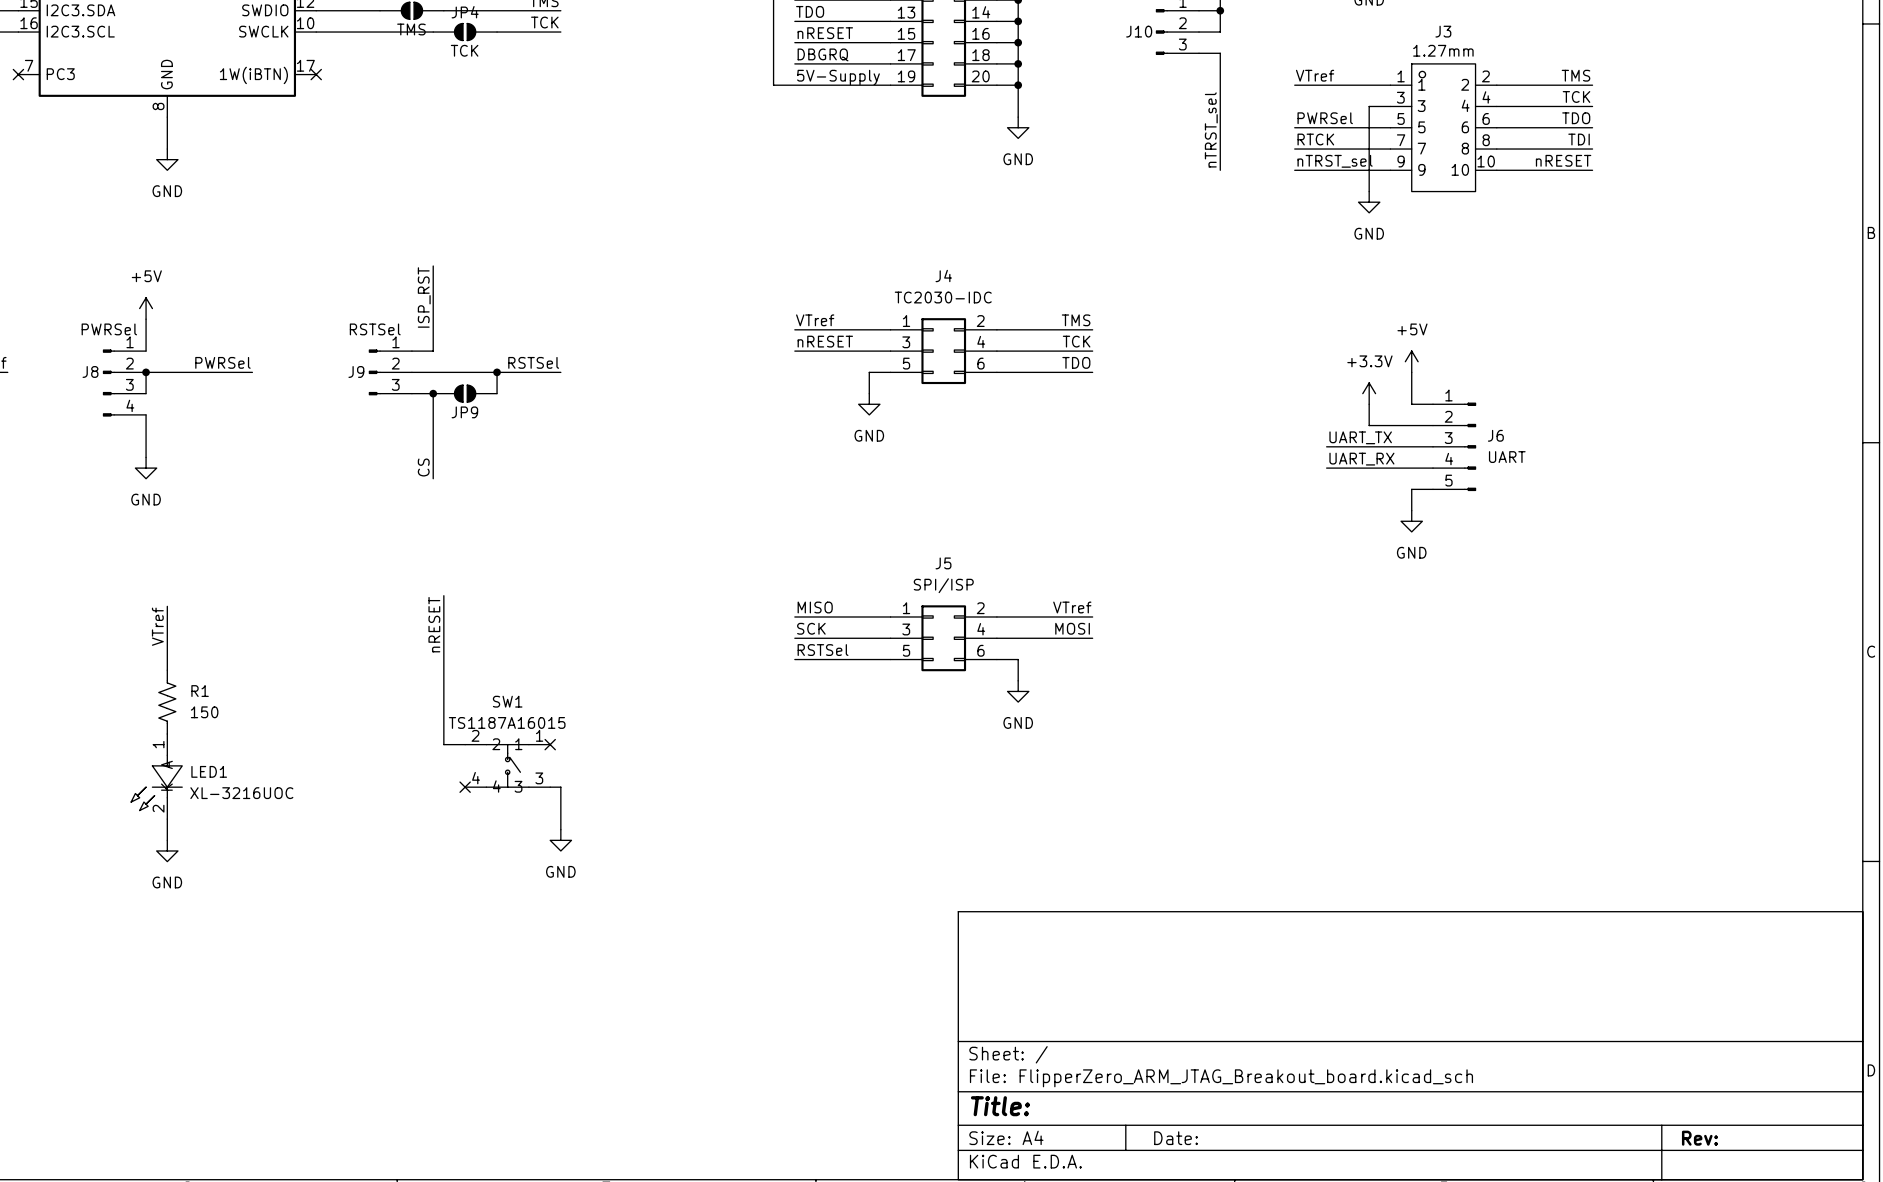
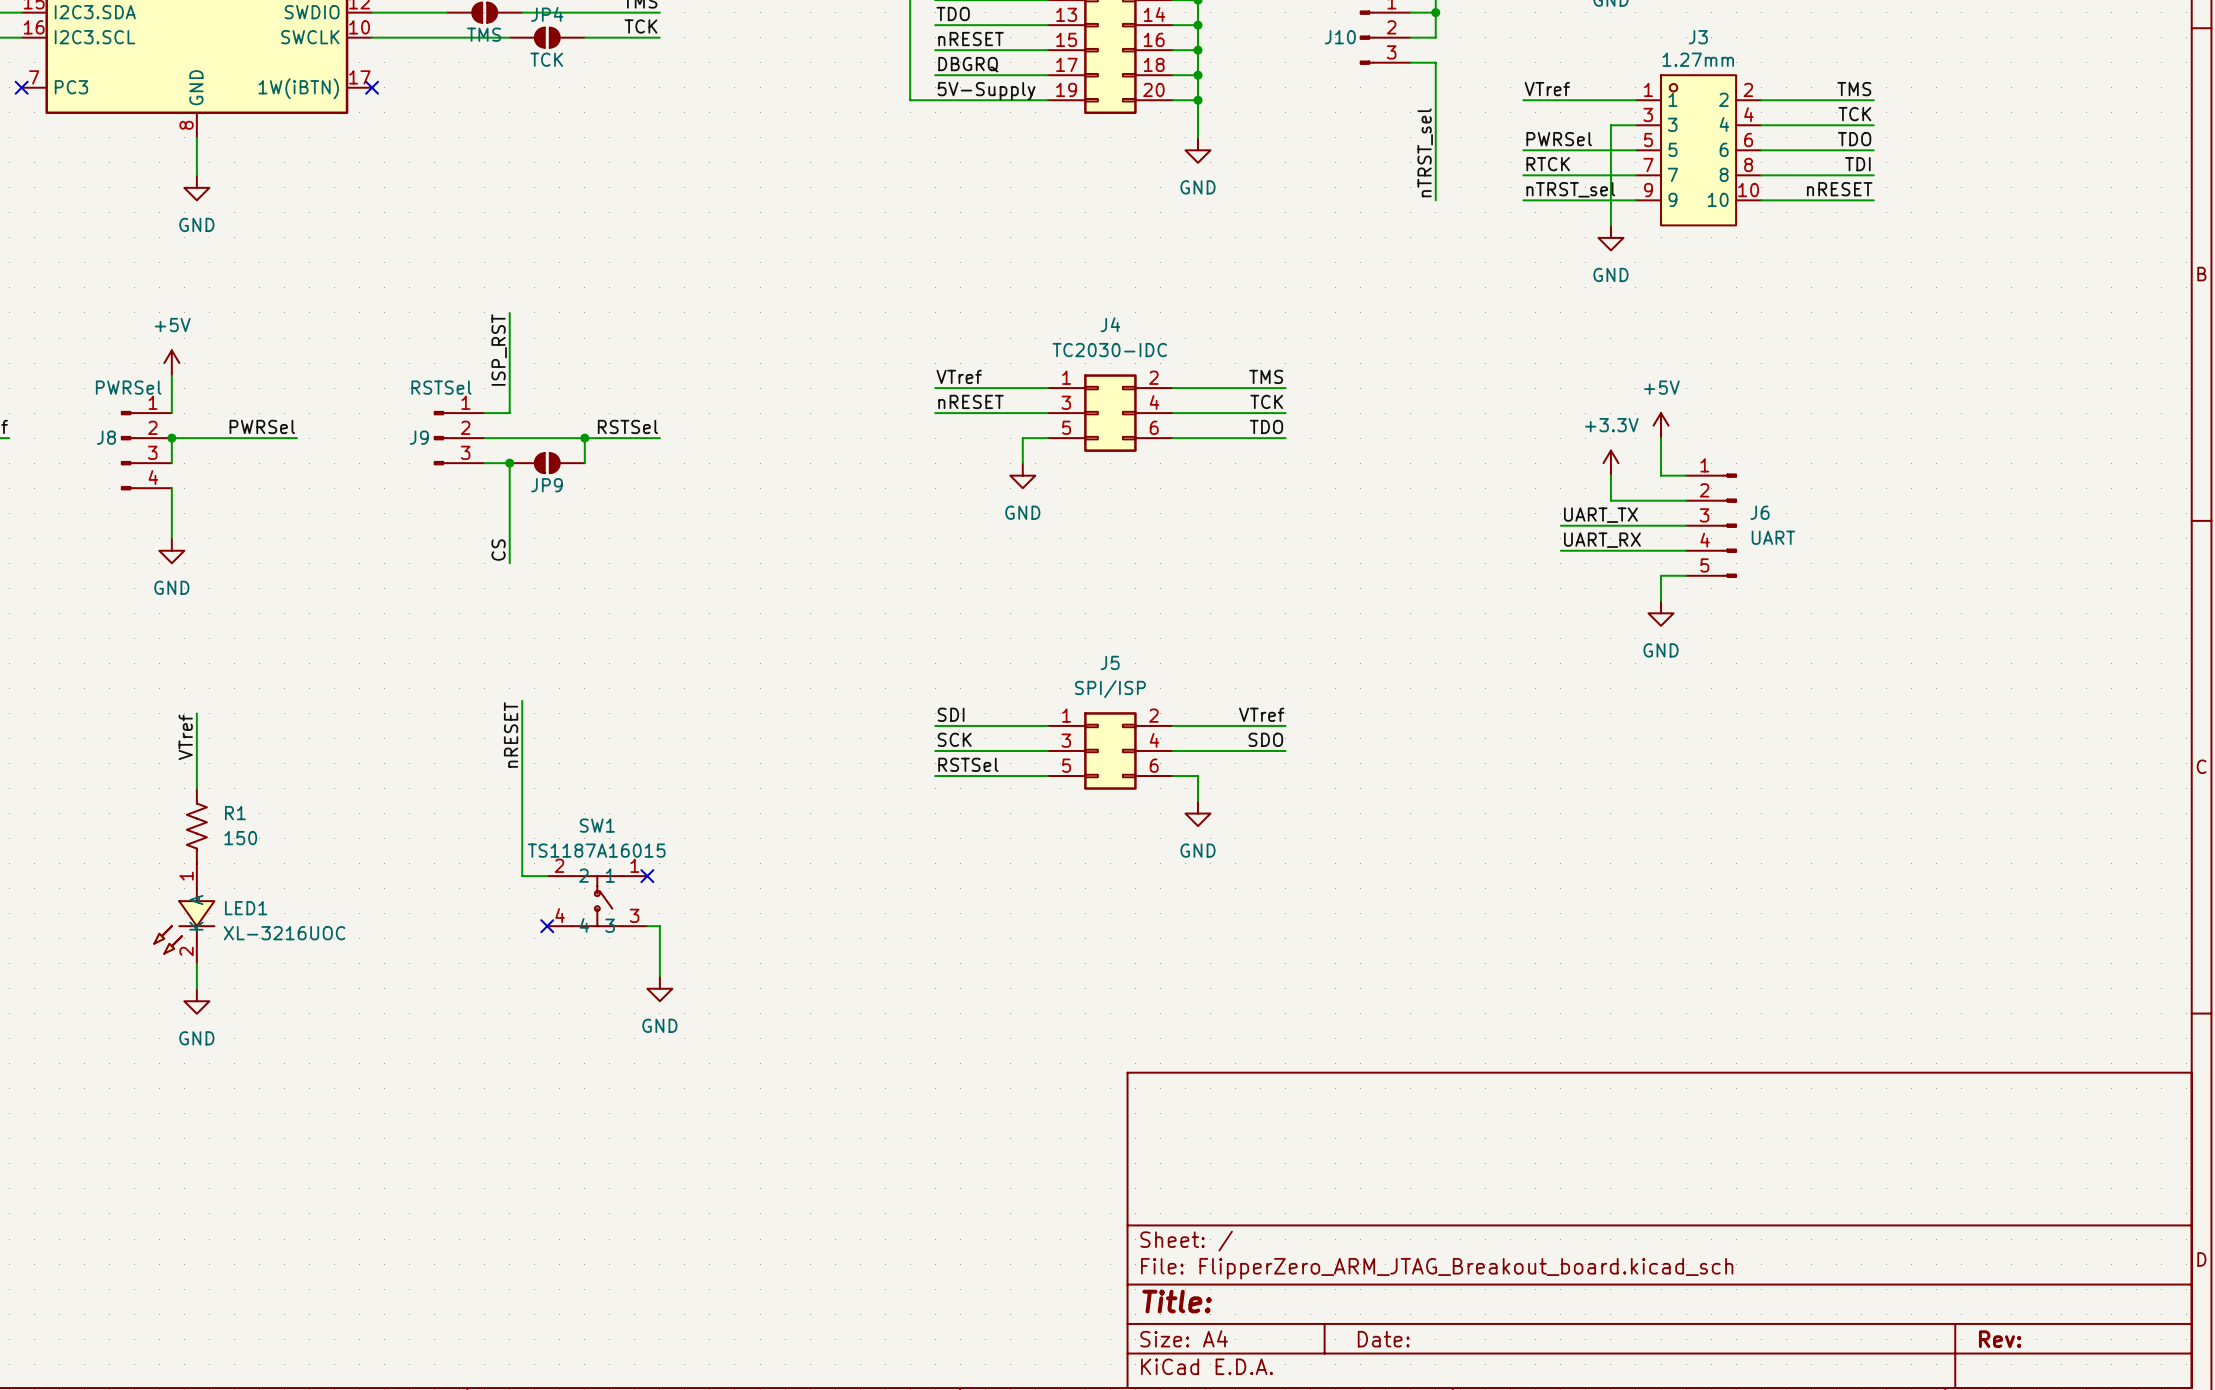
label: MISO (815, 607) -> SDI (951, 714)
label: MOSI (1072, 628) -> SDO (1265, 739)

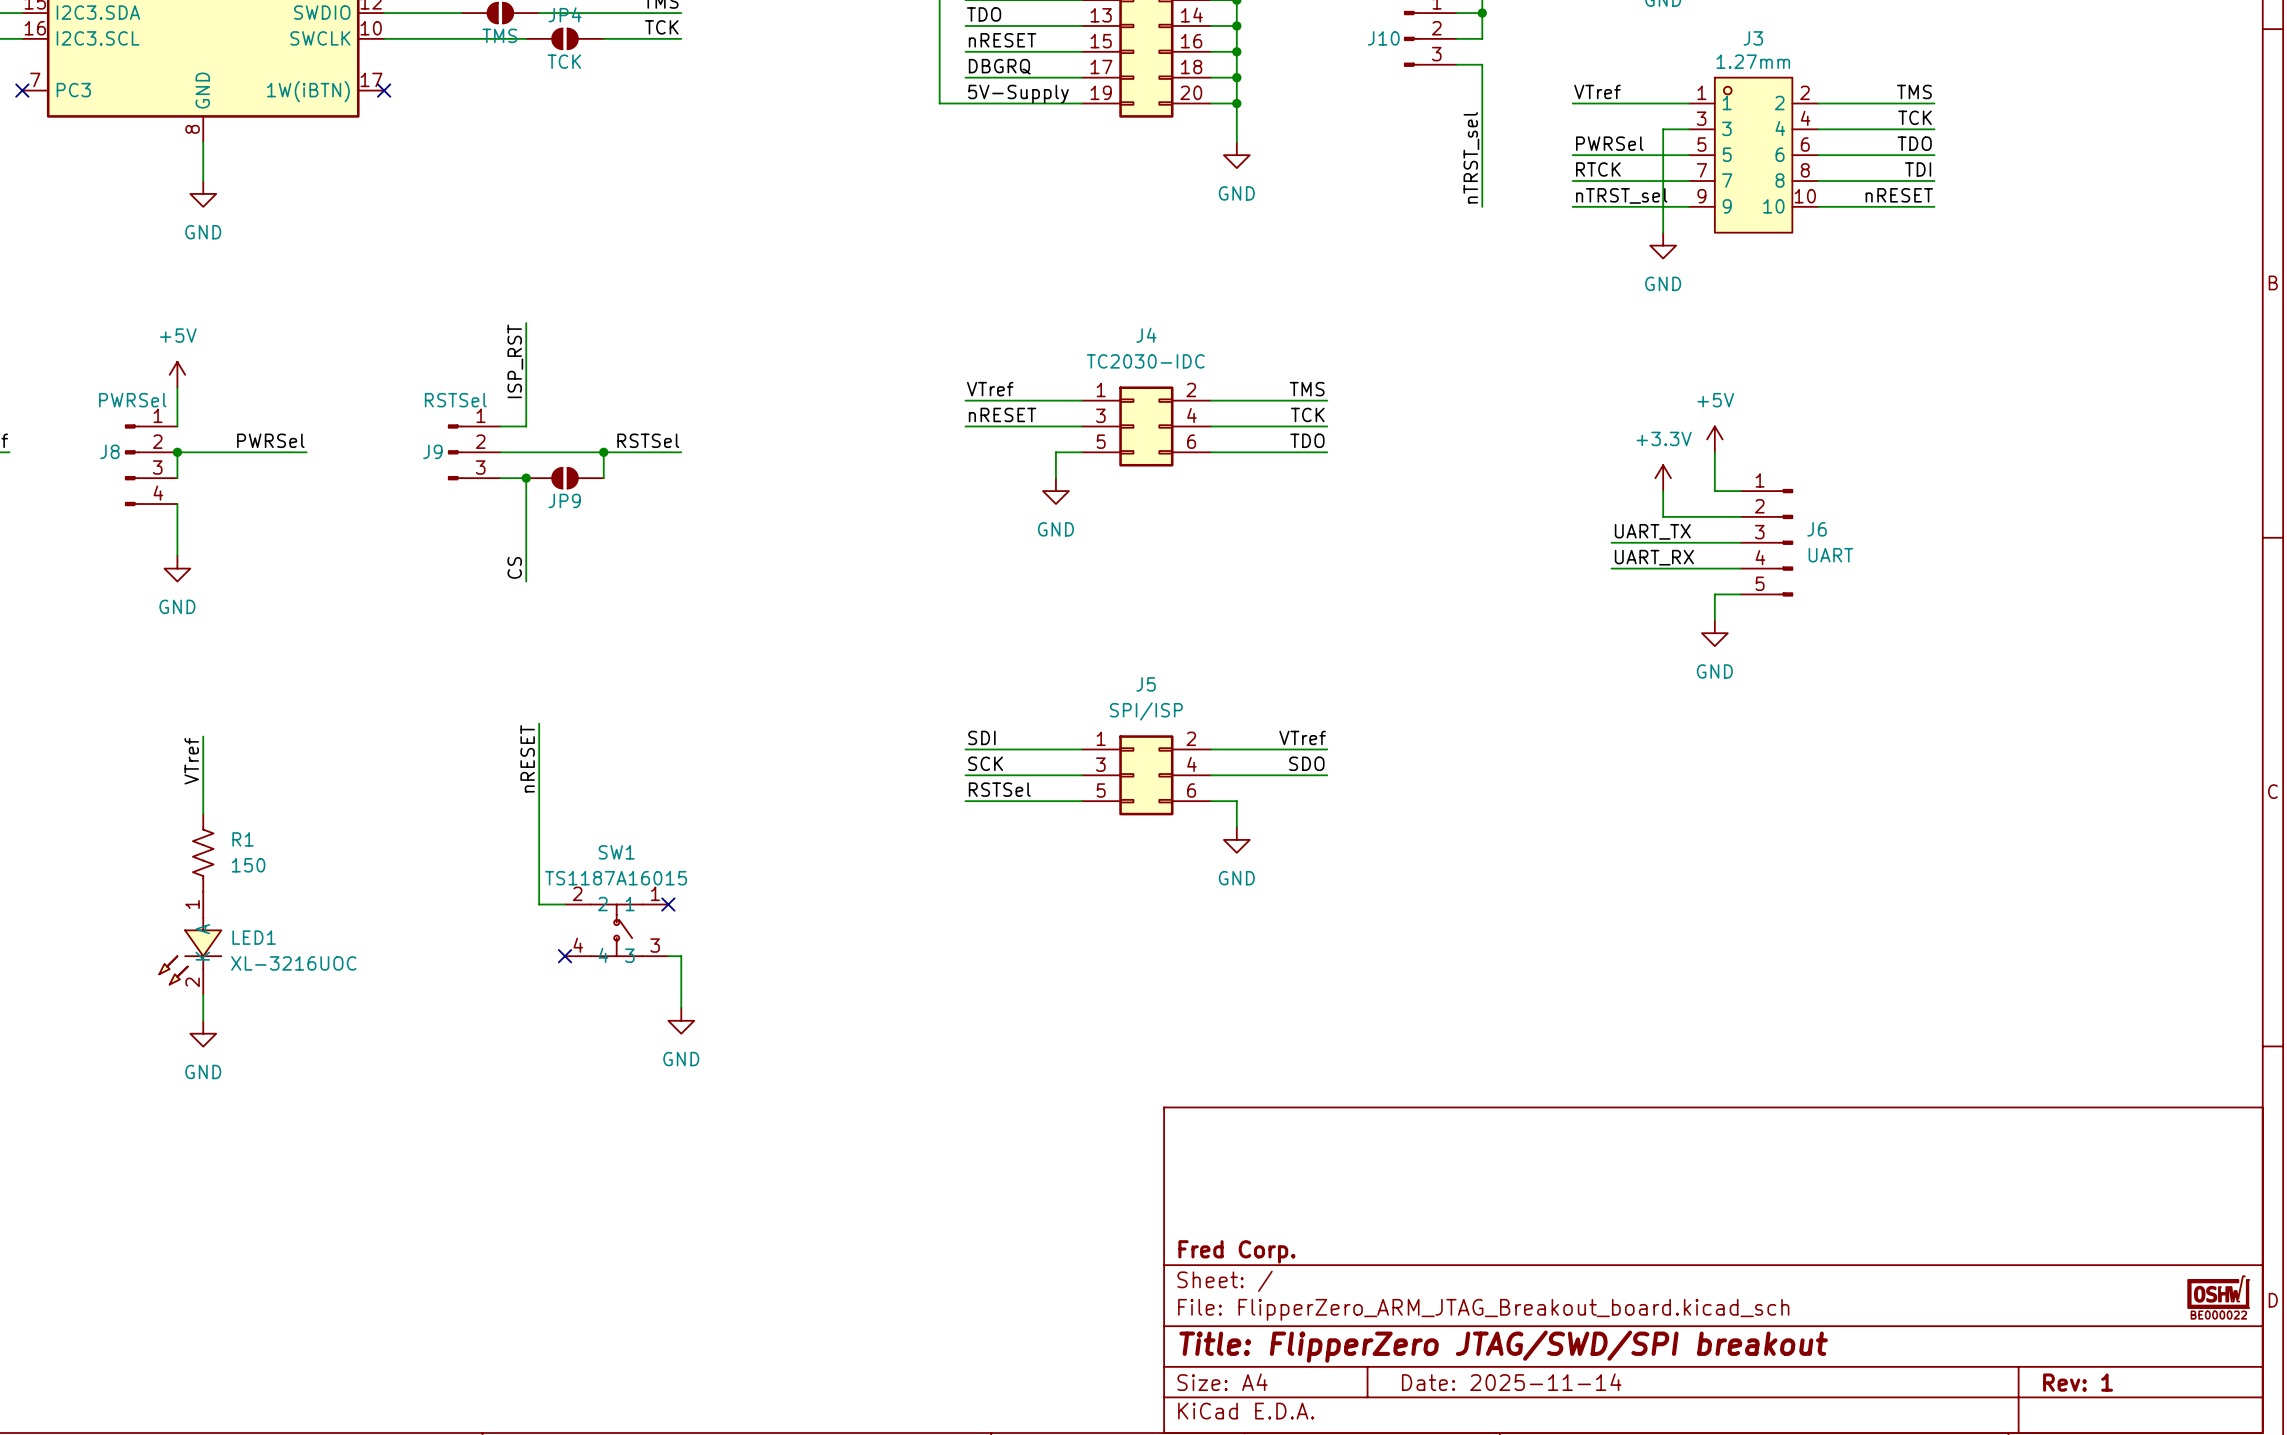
title block: none -> Fred Corp. (1236, 1251)
part: none -> (2218, 1292)
title block: Title: (1177, 1301) -> Title: FlipperZero JTAG/SWD/SPI breakout (1503, 1346)
title block: Date: (1383, 1339) -> Date: 2025-11-14 (1511, 1382)
title block: Rev: (2000, 1339) -> Rev: 1 (2078, 1382)

